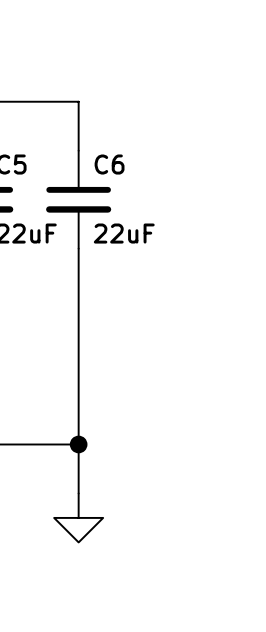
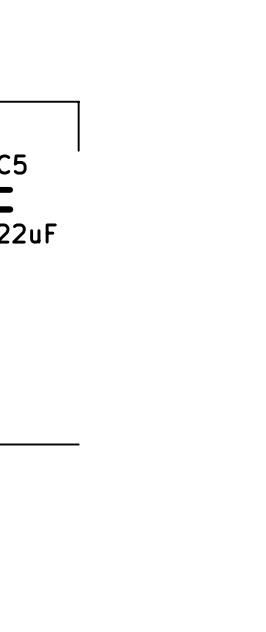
C6: 22uF (78, 199) -> none
wire: (78, 248) (78, 493) -> none
junction: (78, 444) -> none
power symbol: (78, 517) -> none

